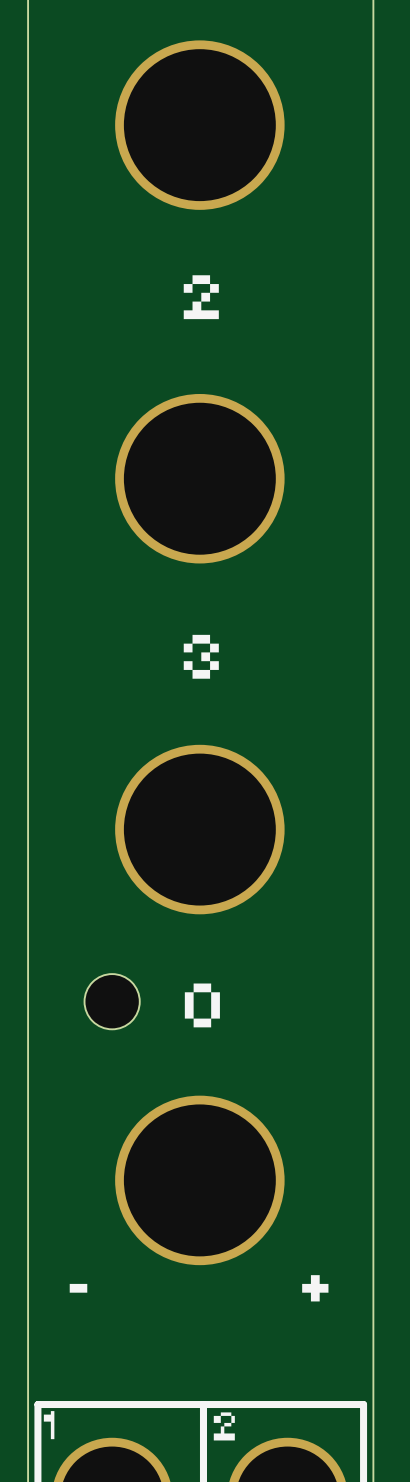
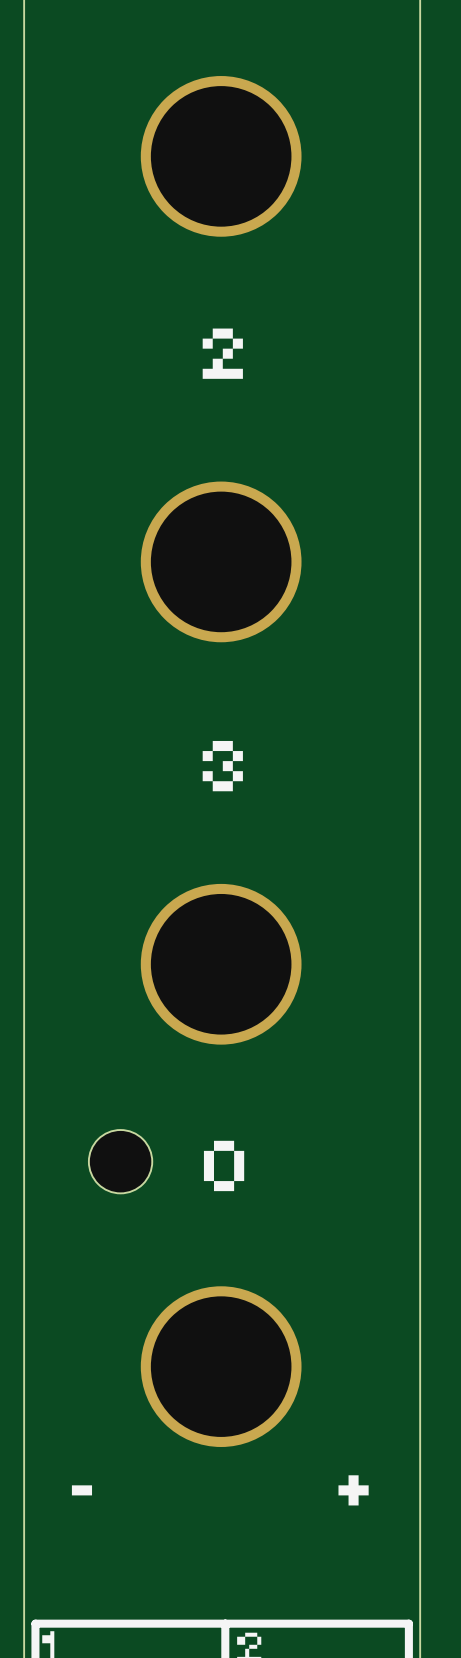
via size: [115, 40, 285, 210] -> [140, 76, 302, 237]
via size: [115, 393, 285, 564] -> [140, 481, 302, 643]
via size: [115, 744, 285, 915] -> [140, 883, 302, 1045]
via size: [115, 1095, 285, 1266] -> [140, 1286, 302, 1447]

